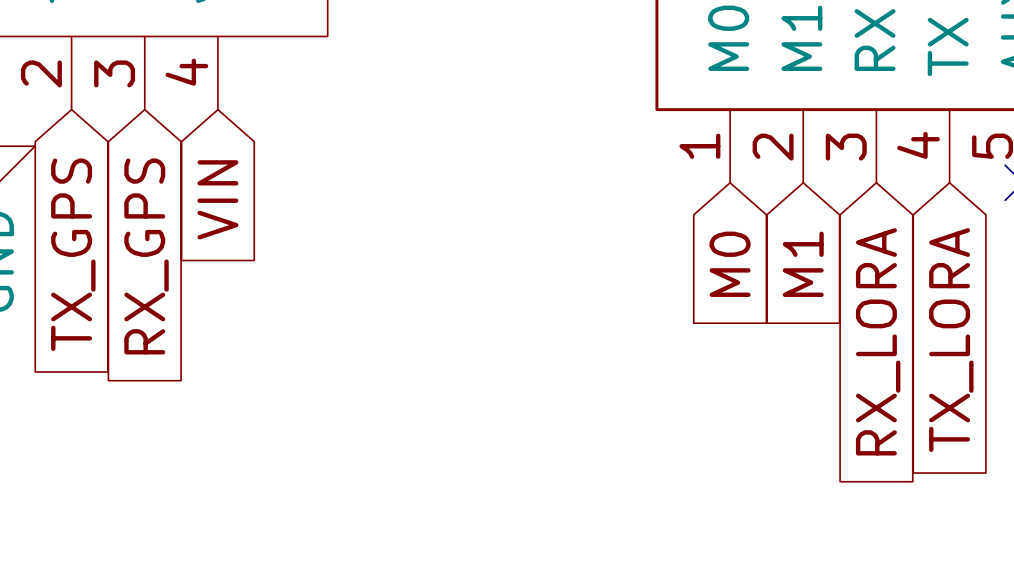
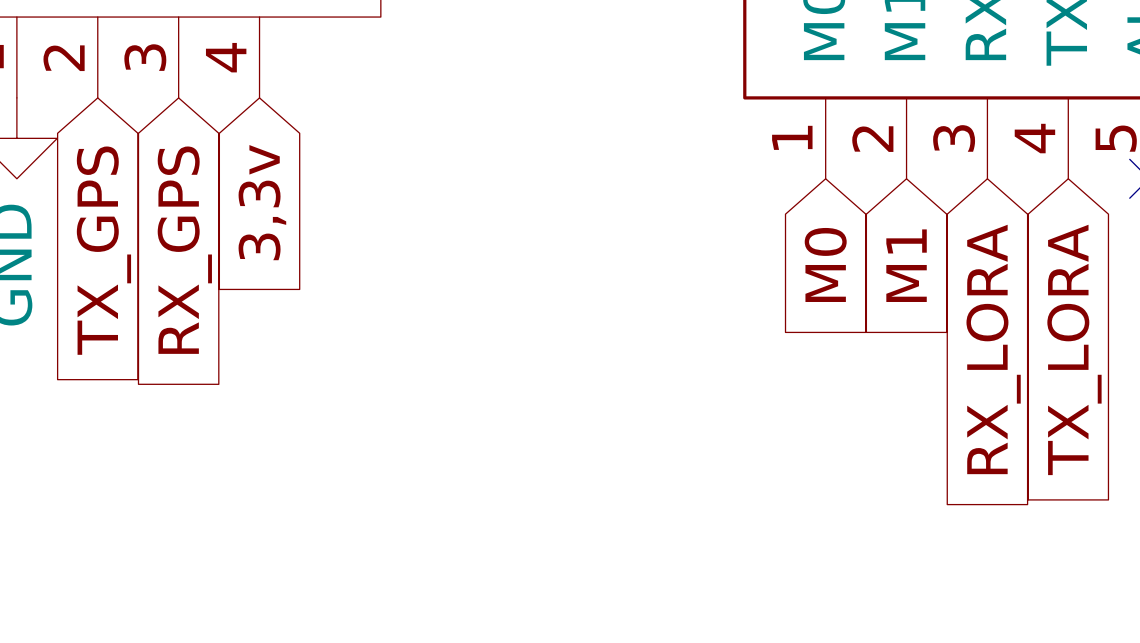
global label: VIN (217, 199) -> 3,3v (262, 202)

